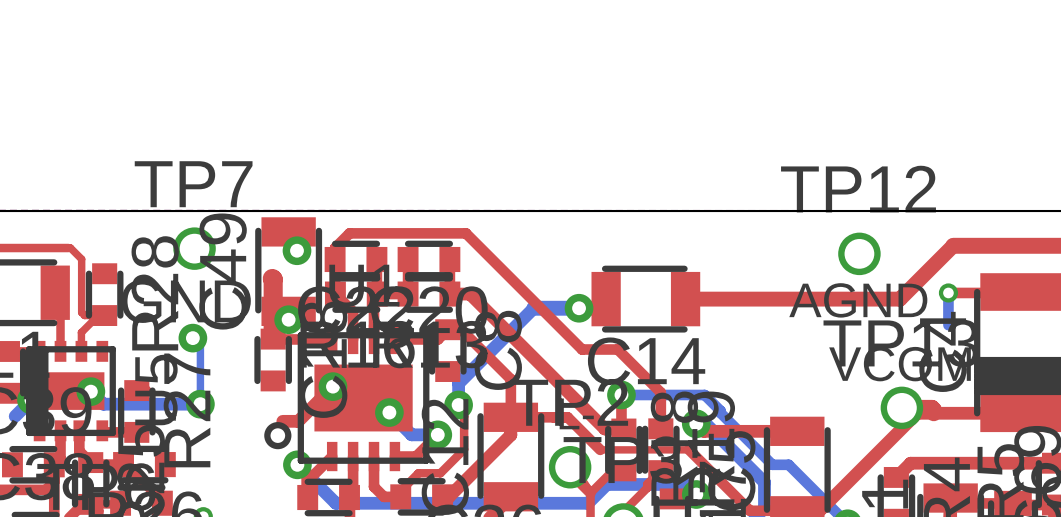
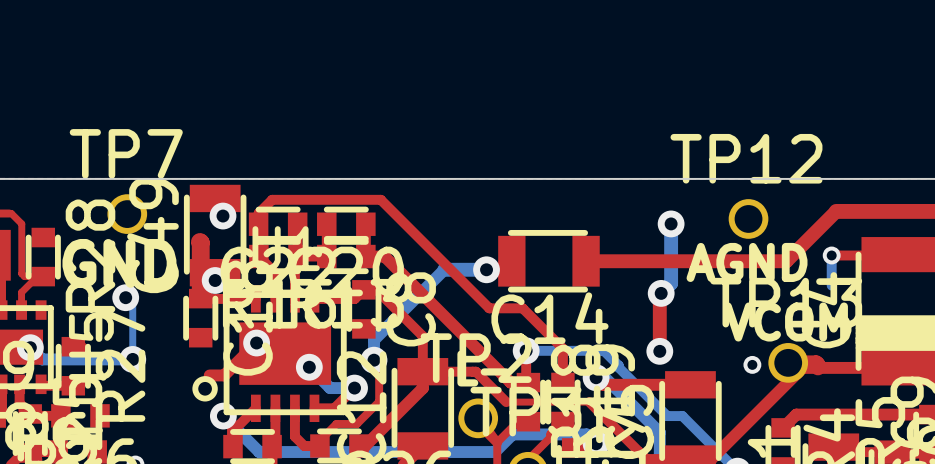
bottom track: none -> (671, 223) (671, 283) (661, 293)
via: none -> (671, 223)
top track: none -> (661, 293) (659, 351)
via: none -> (661, 293)
via: none -> (659, 351)
via: none -> (752, 364)

